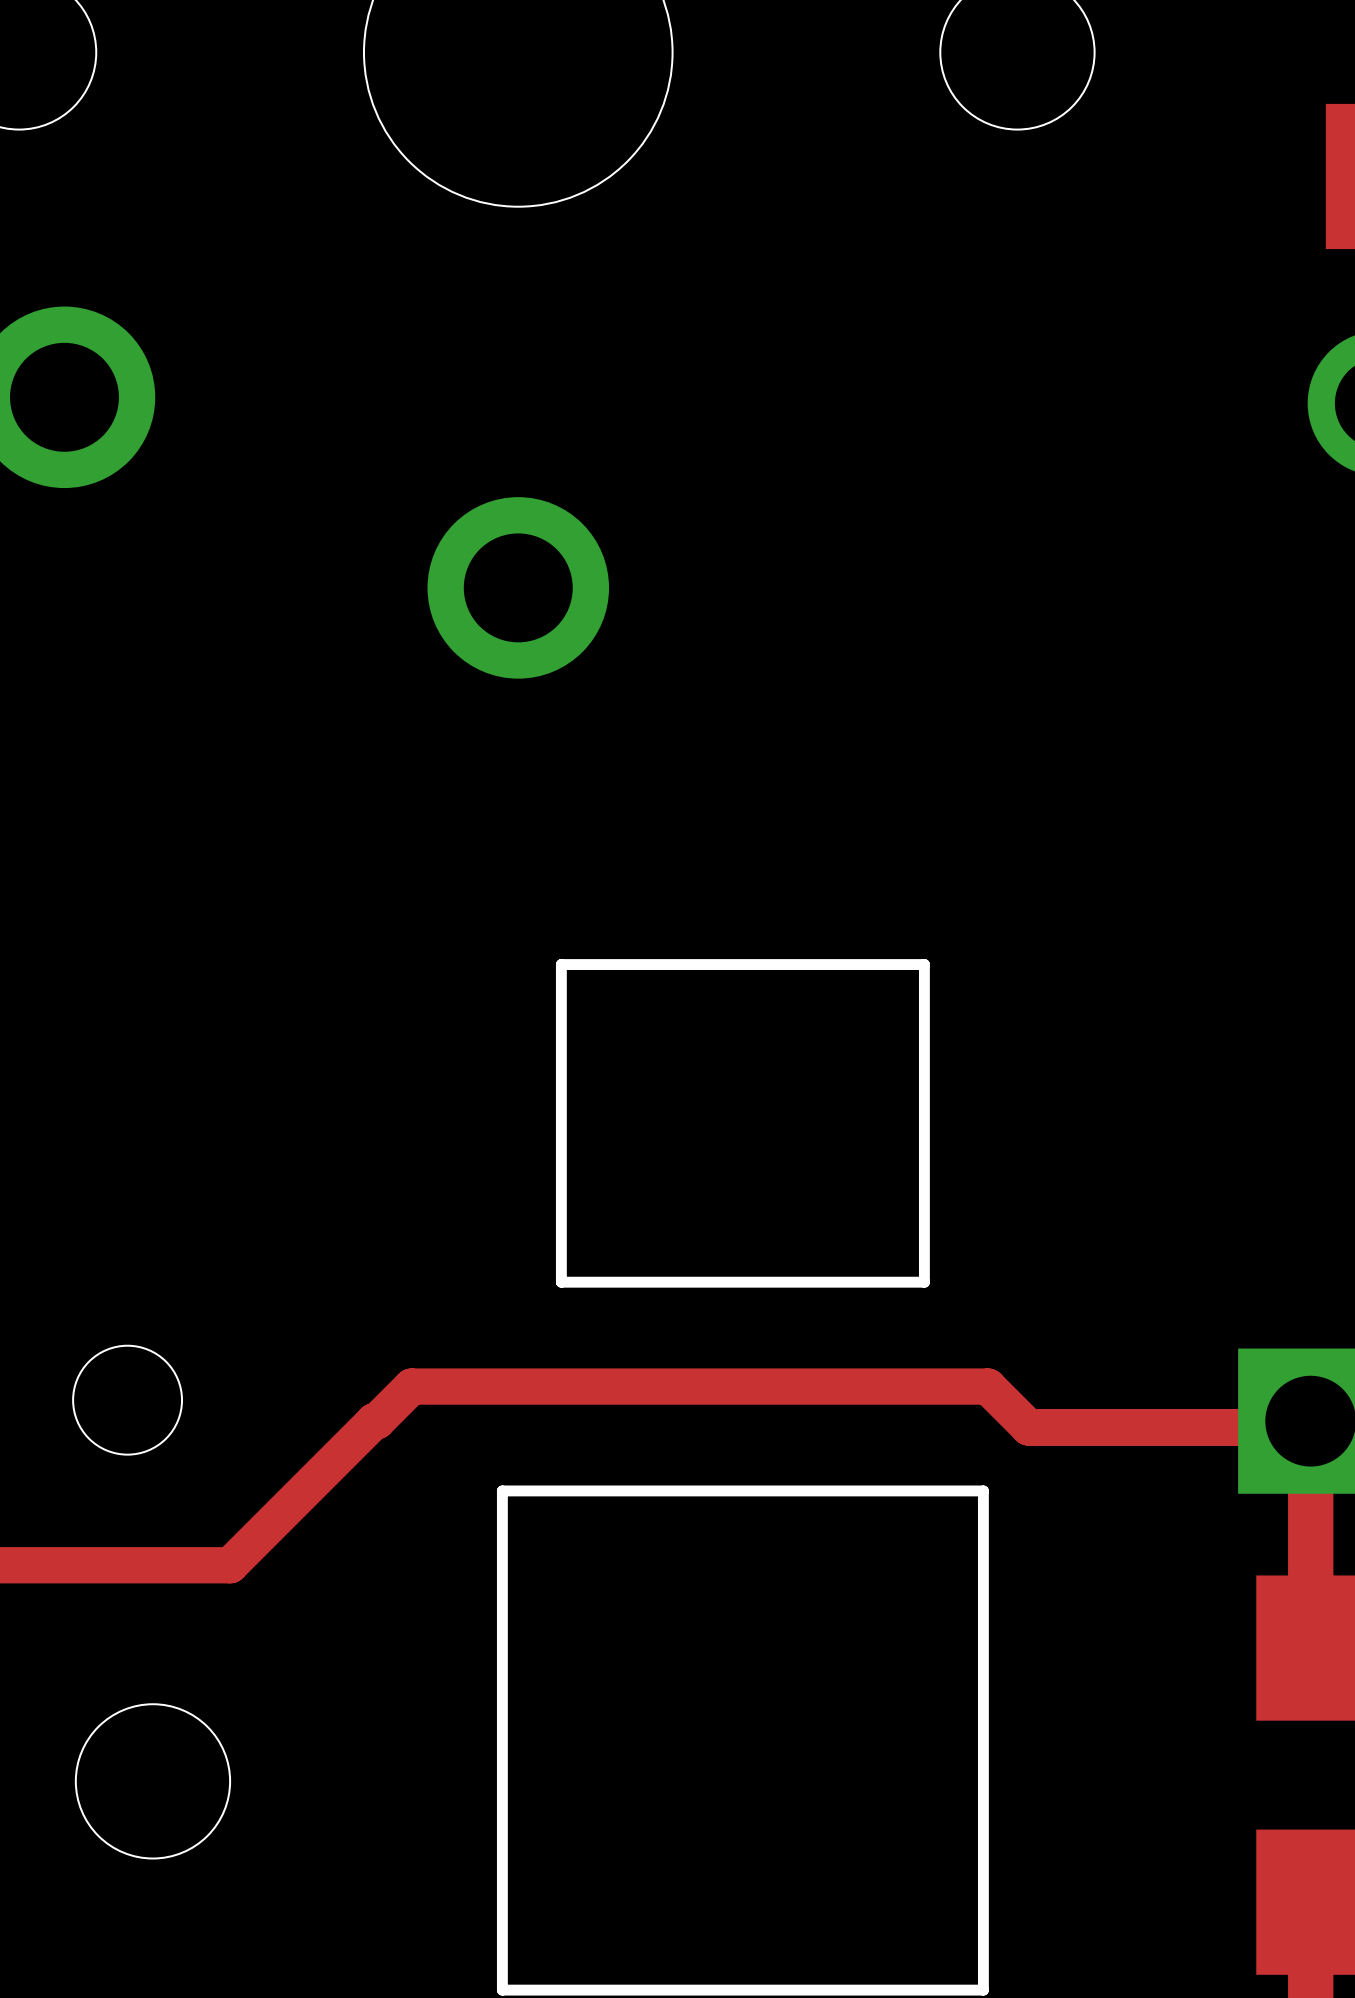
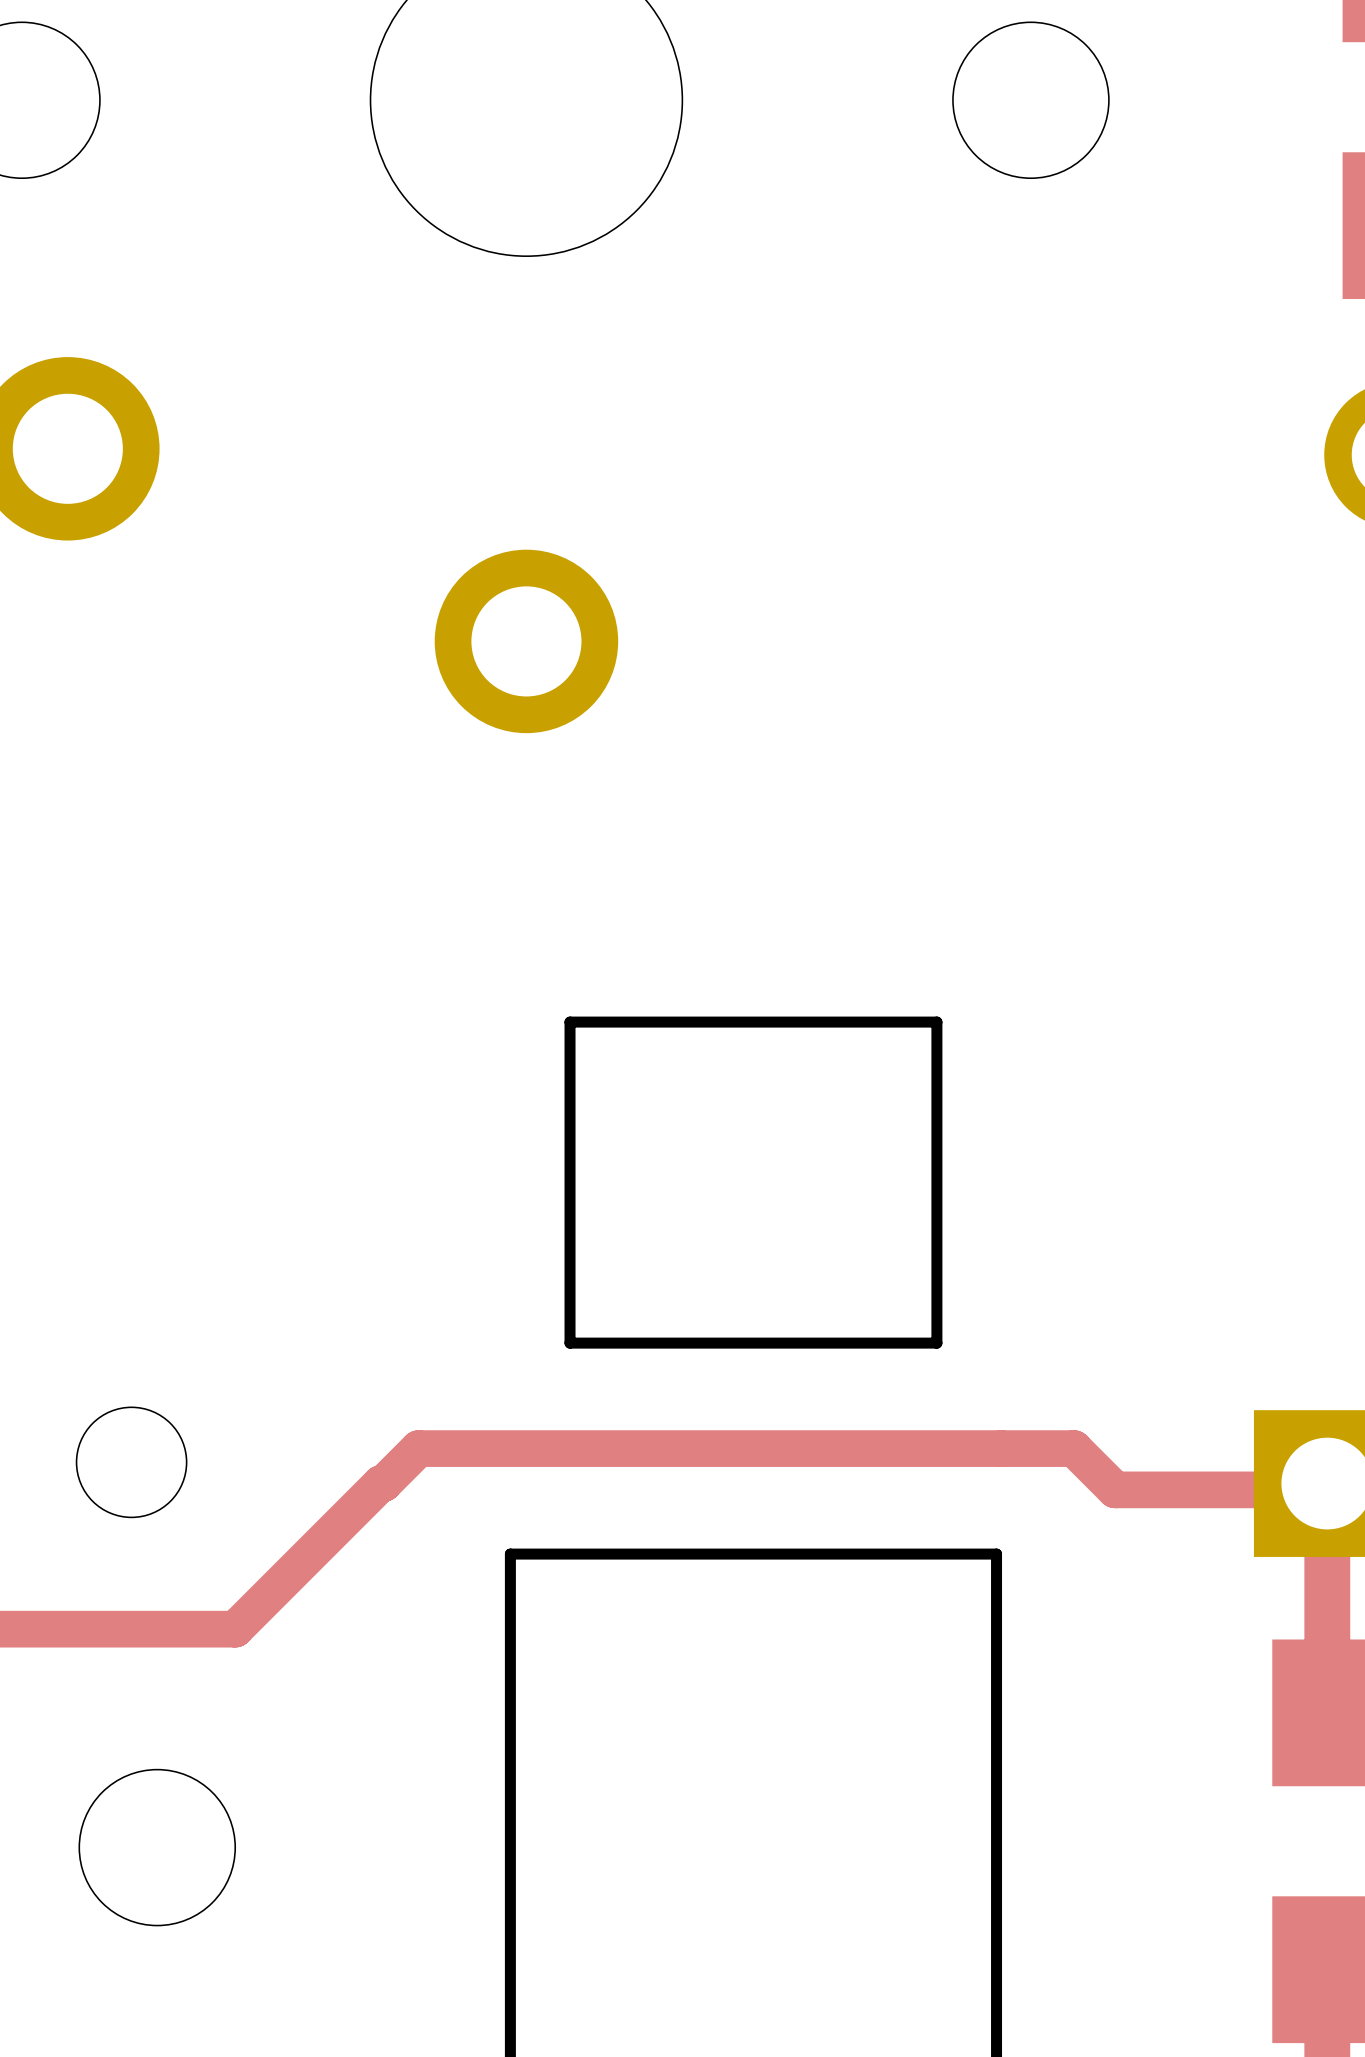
track: (987, 1386) (1028, 1427) (1100, 1427) -> (1001, 1448) (1073, 1448) (1115, 1489)

